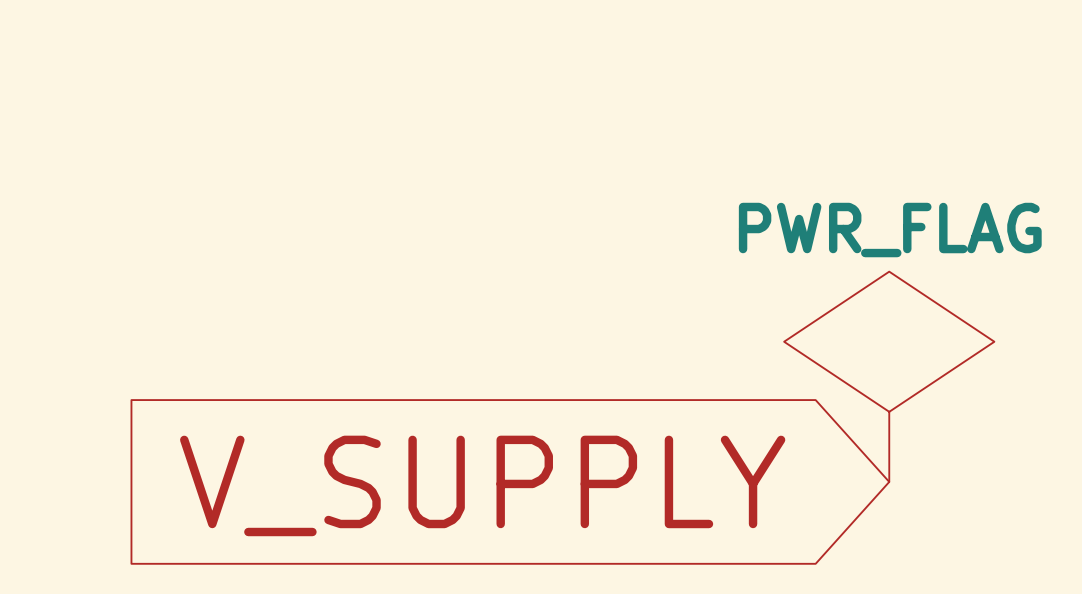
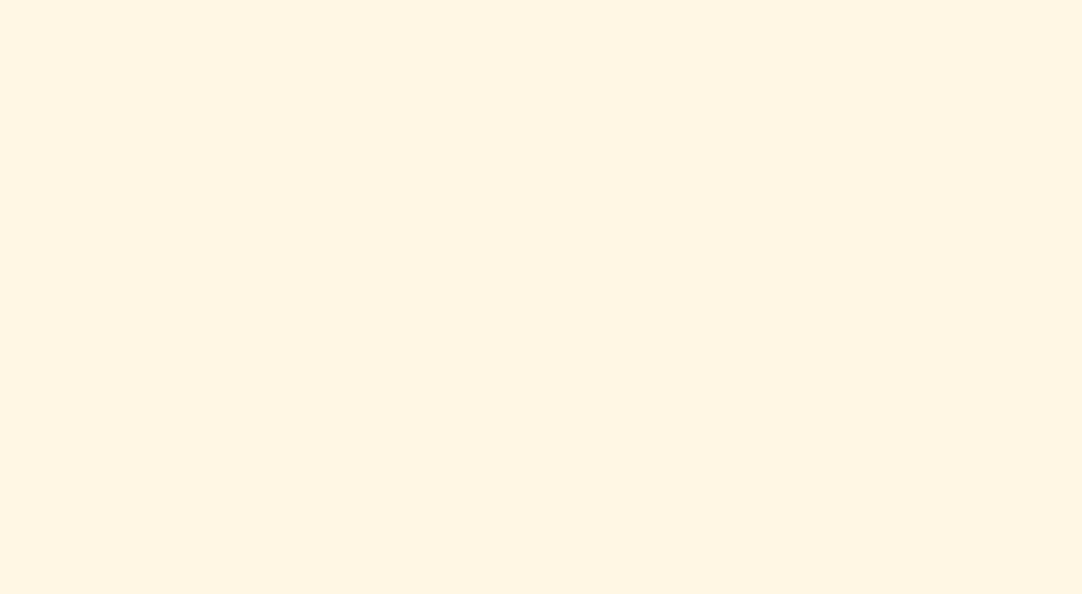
power symbol: PWR_FLAG (889, 376) -> none
global label: V_SUPPLY (482, 485) -> none

